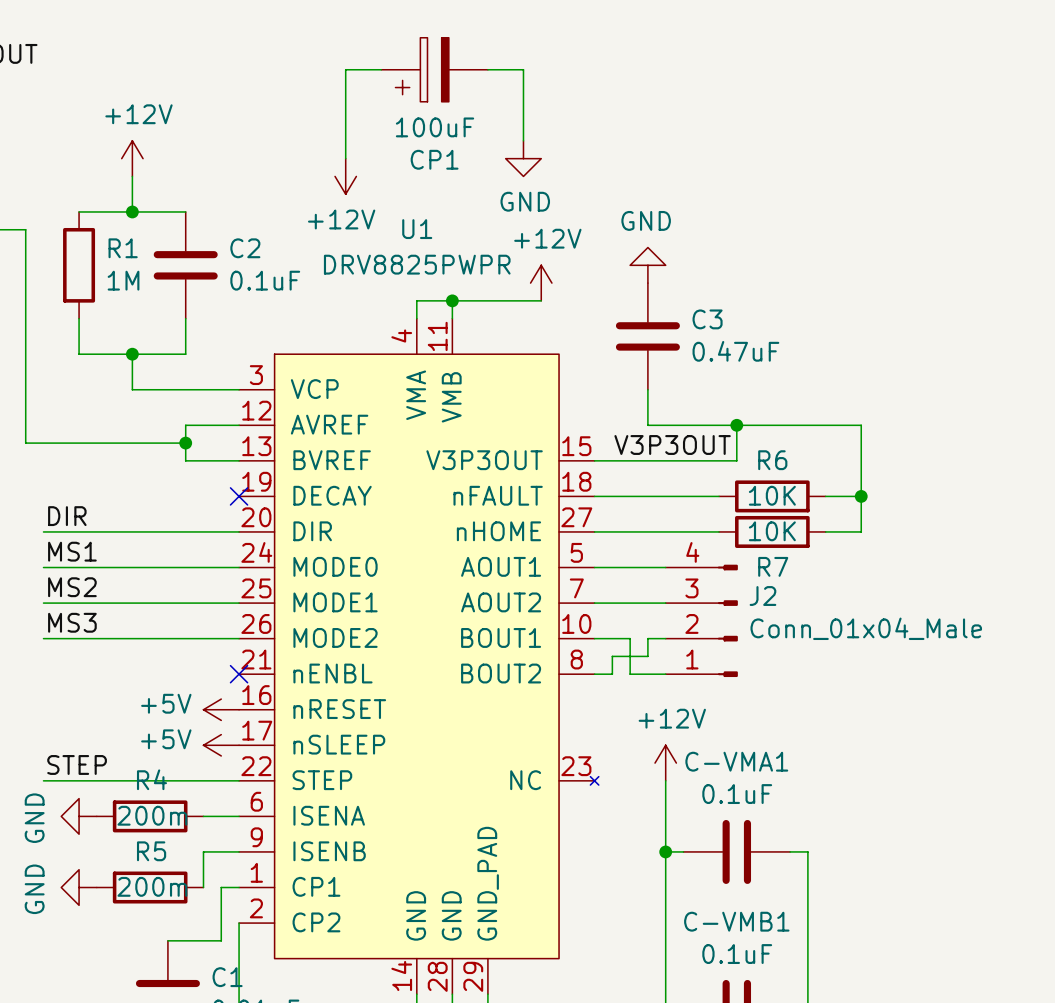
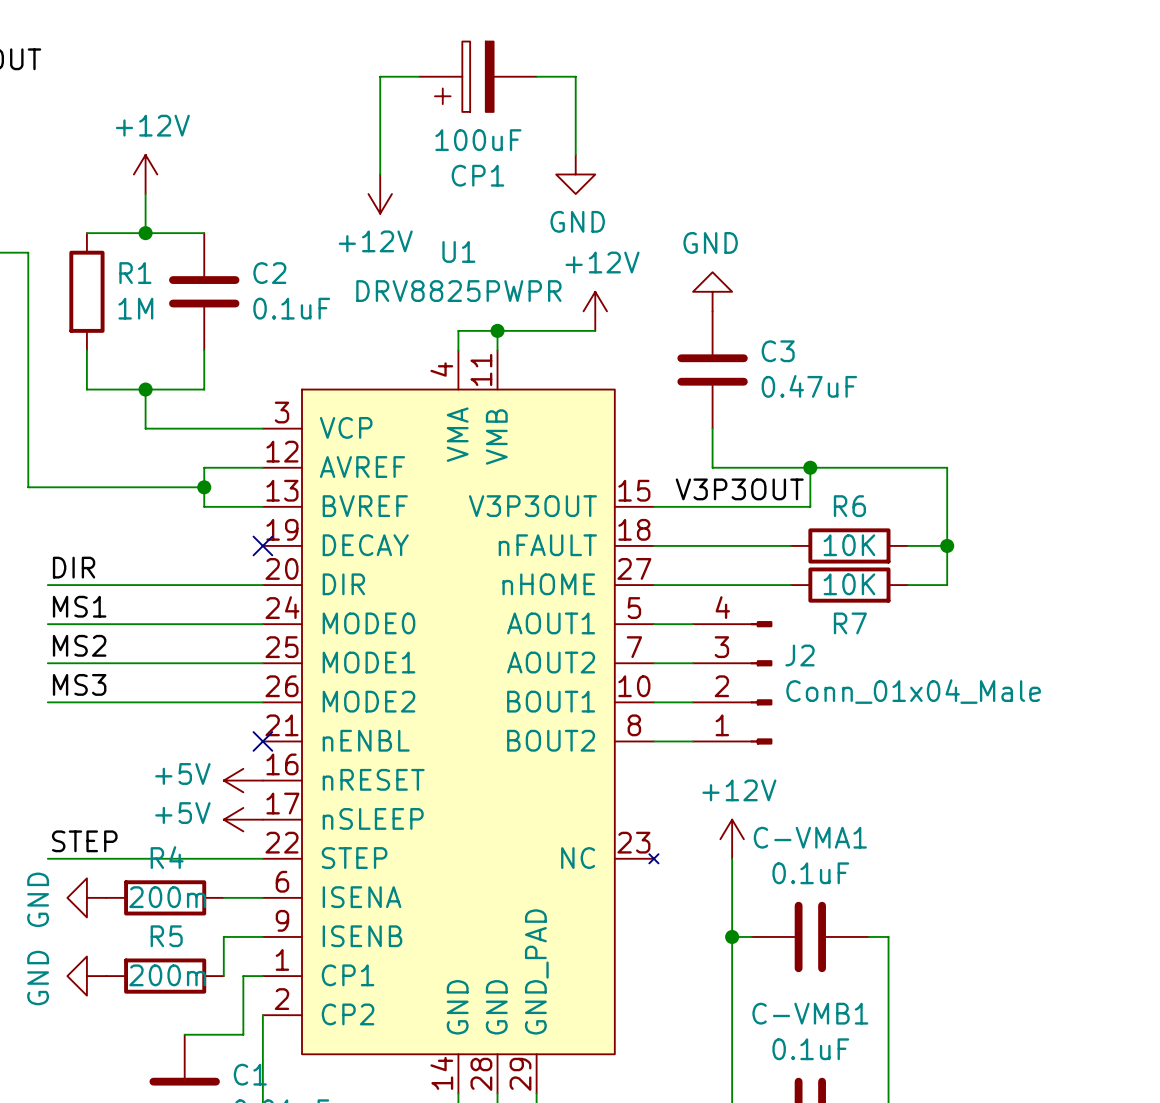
J2 position: (701, 620) -> (732, 682)
wire: (630, 638) (630, 674) (665, 674) -> none
wire: (665, 638) (647, 638) (647, 656) (612, 656) (612, 674) -> (693, 741) (673, 741)

